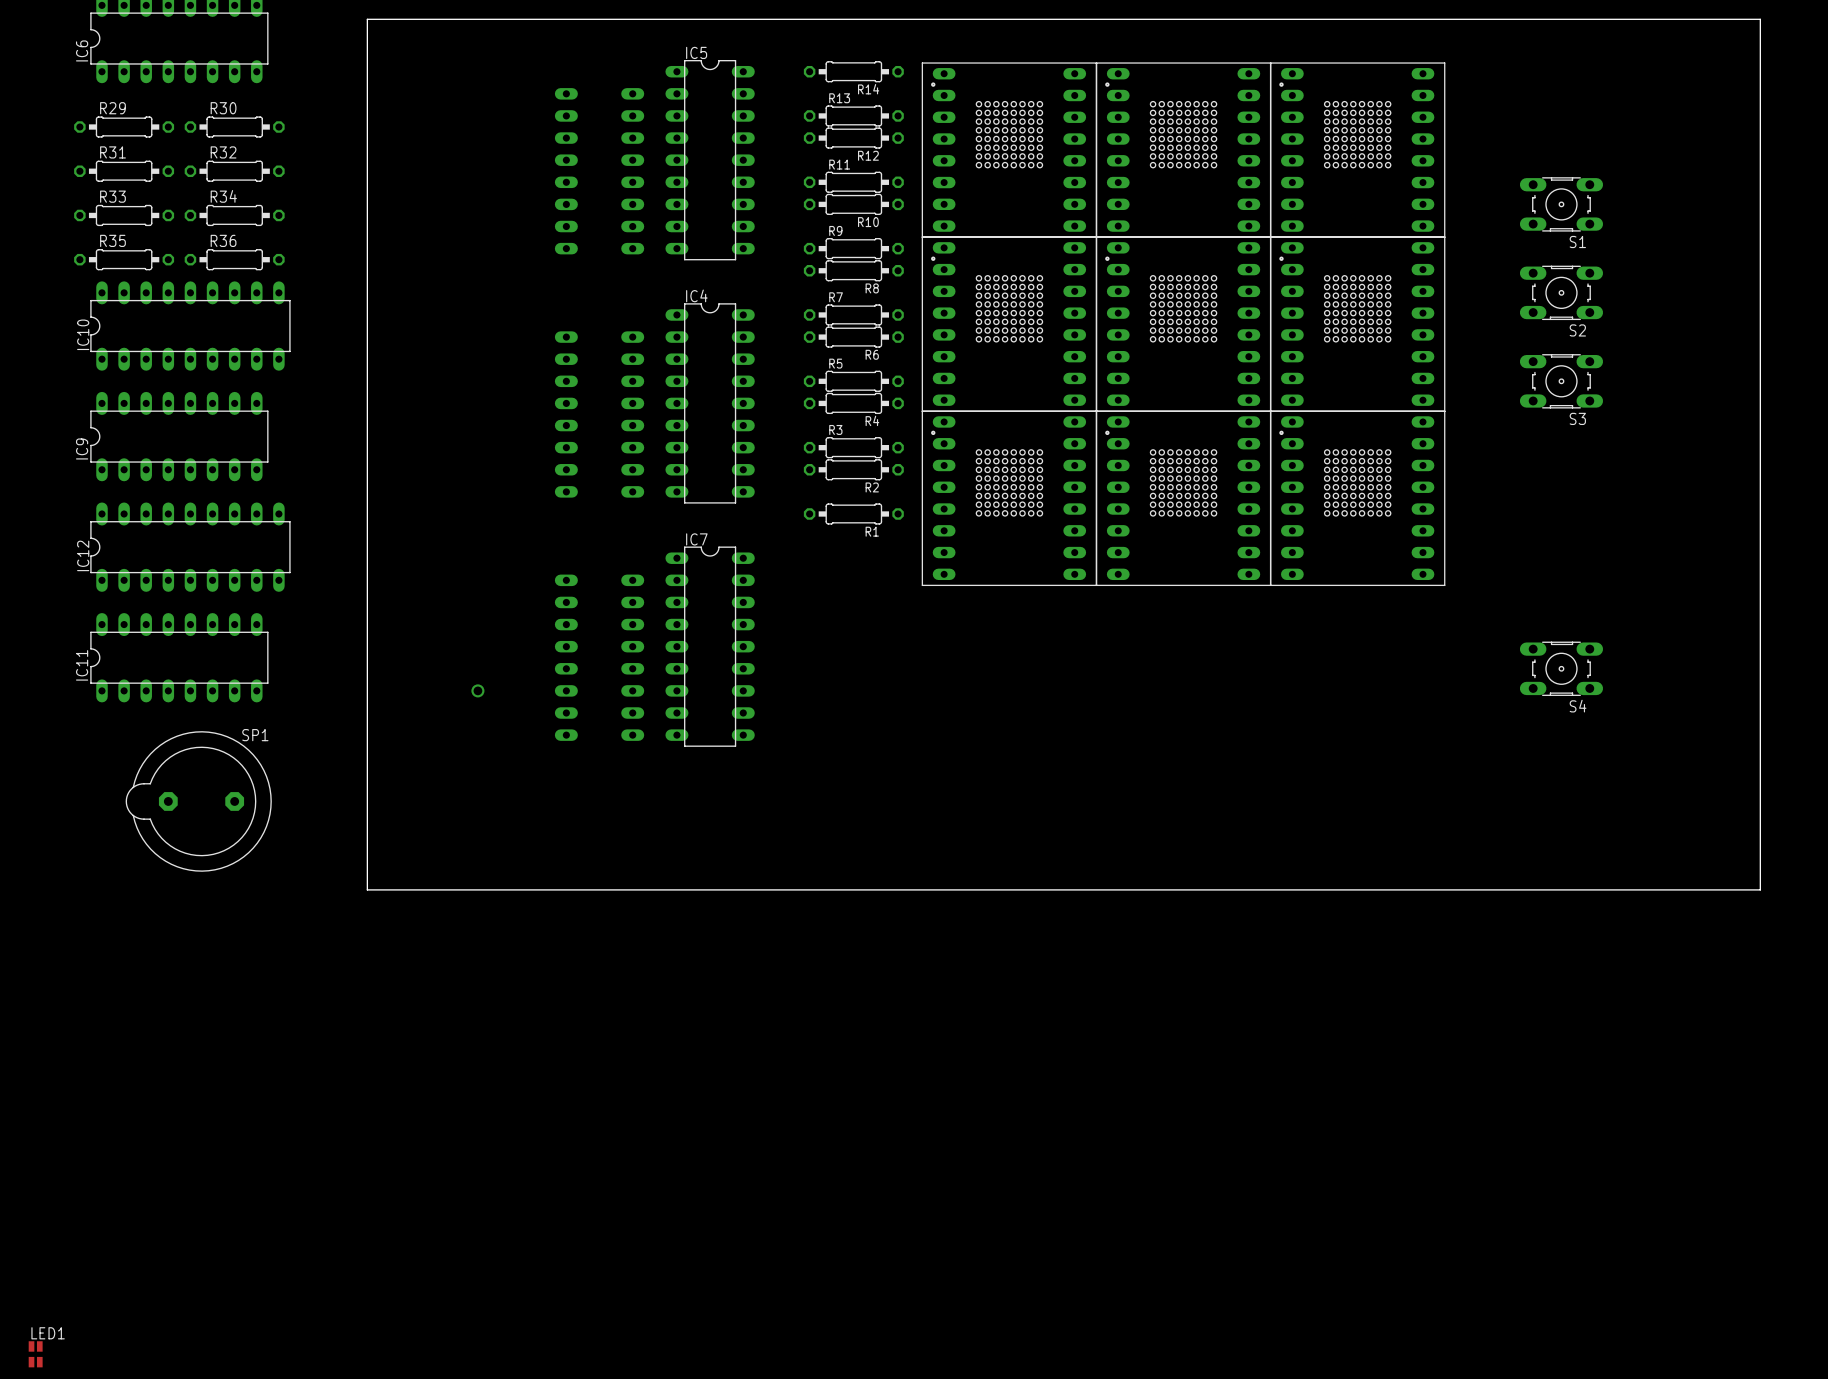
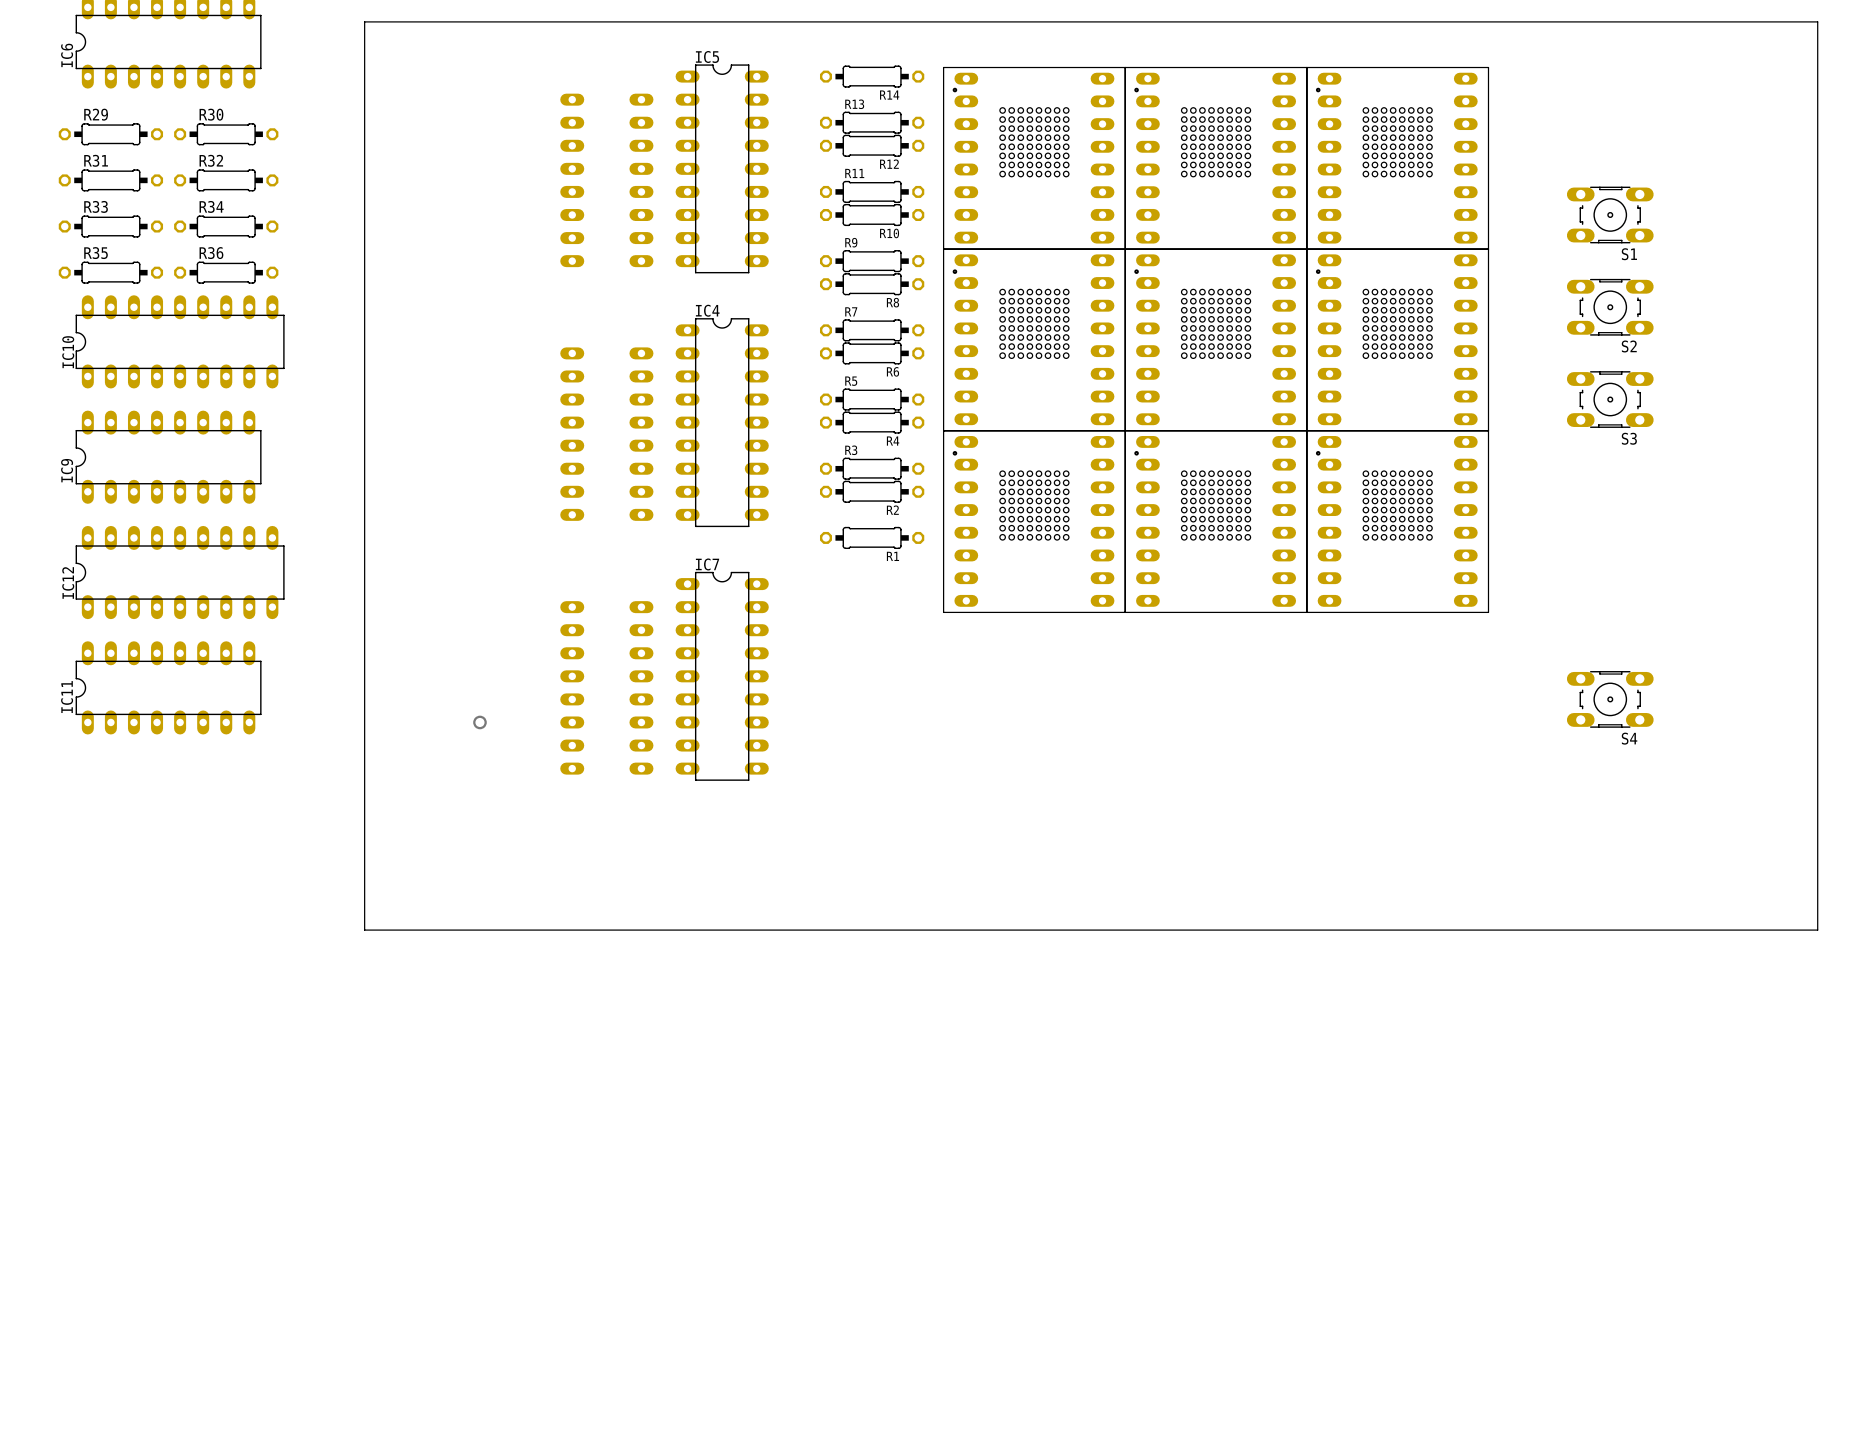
SP1: (198, 801) -> none
LED1: (35, 1354) -> none

